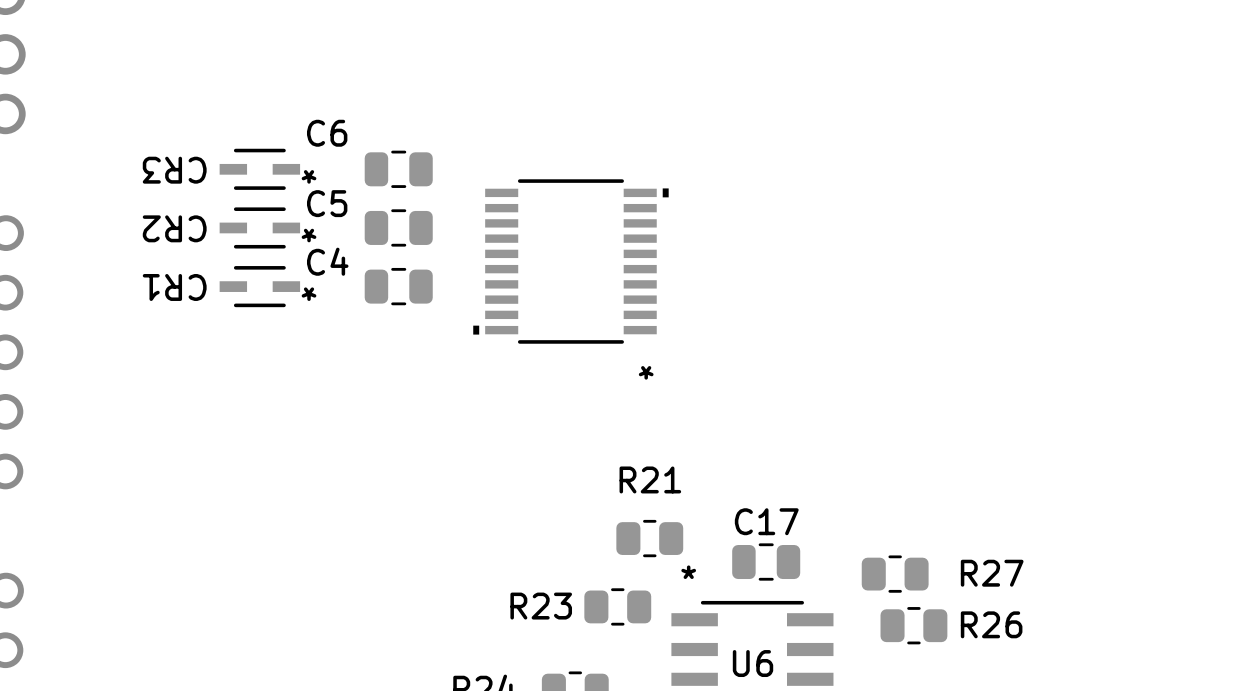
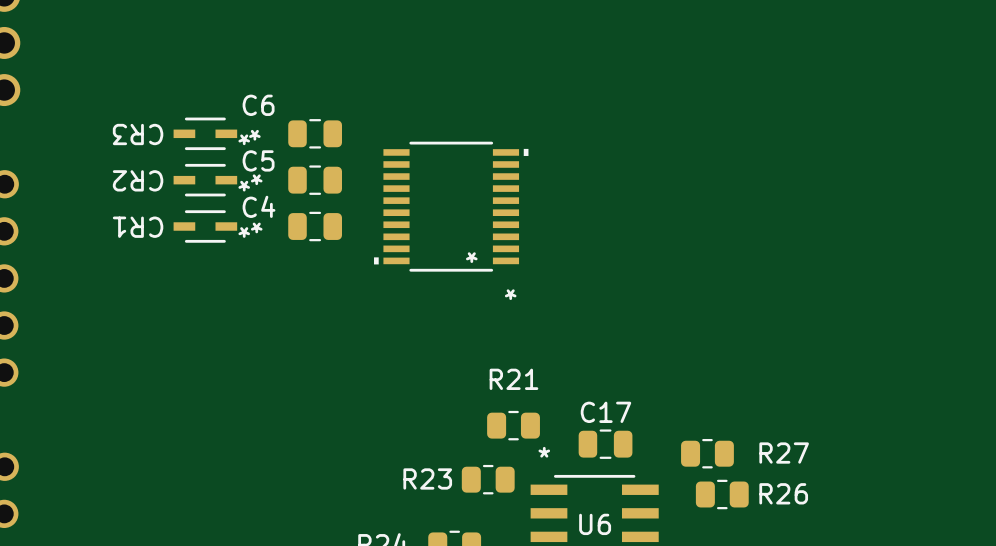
CR3 text: none -> * (254, 135)
CR2 text: none -> * (256, 179)
CR1 text: none -> * (256, 227)
part text: none -> * (471, 257)

